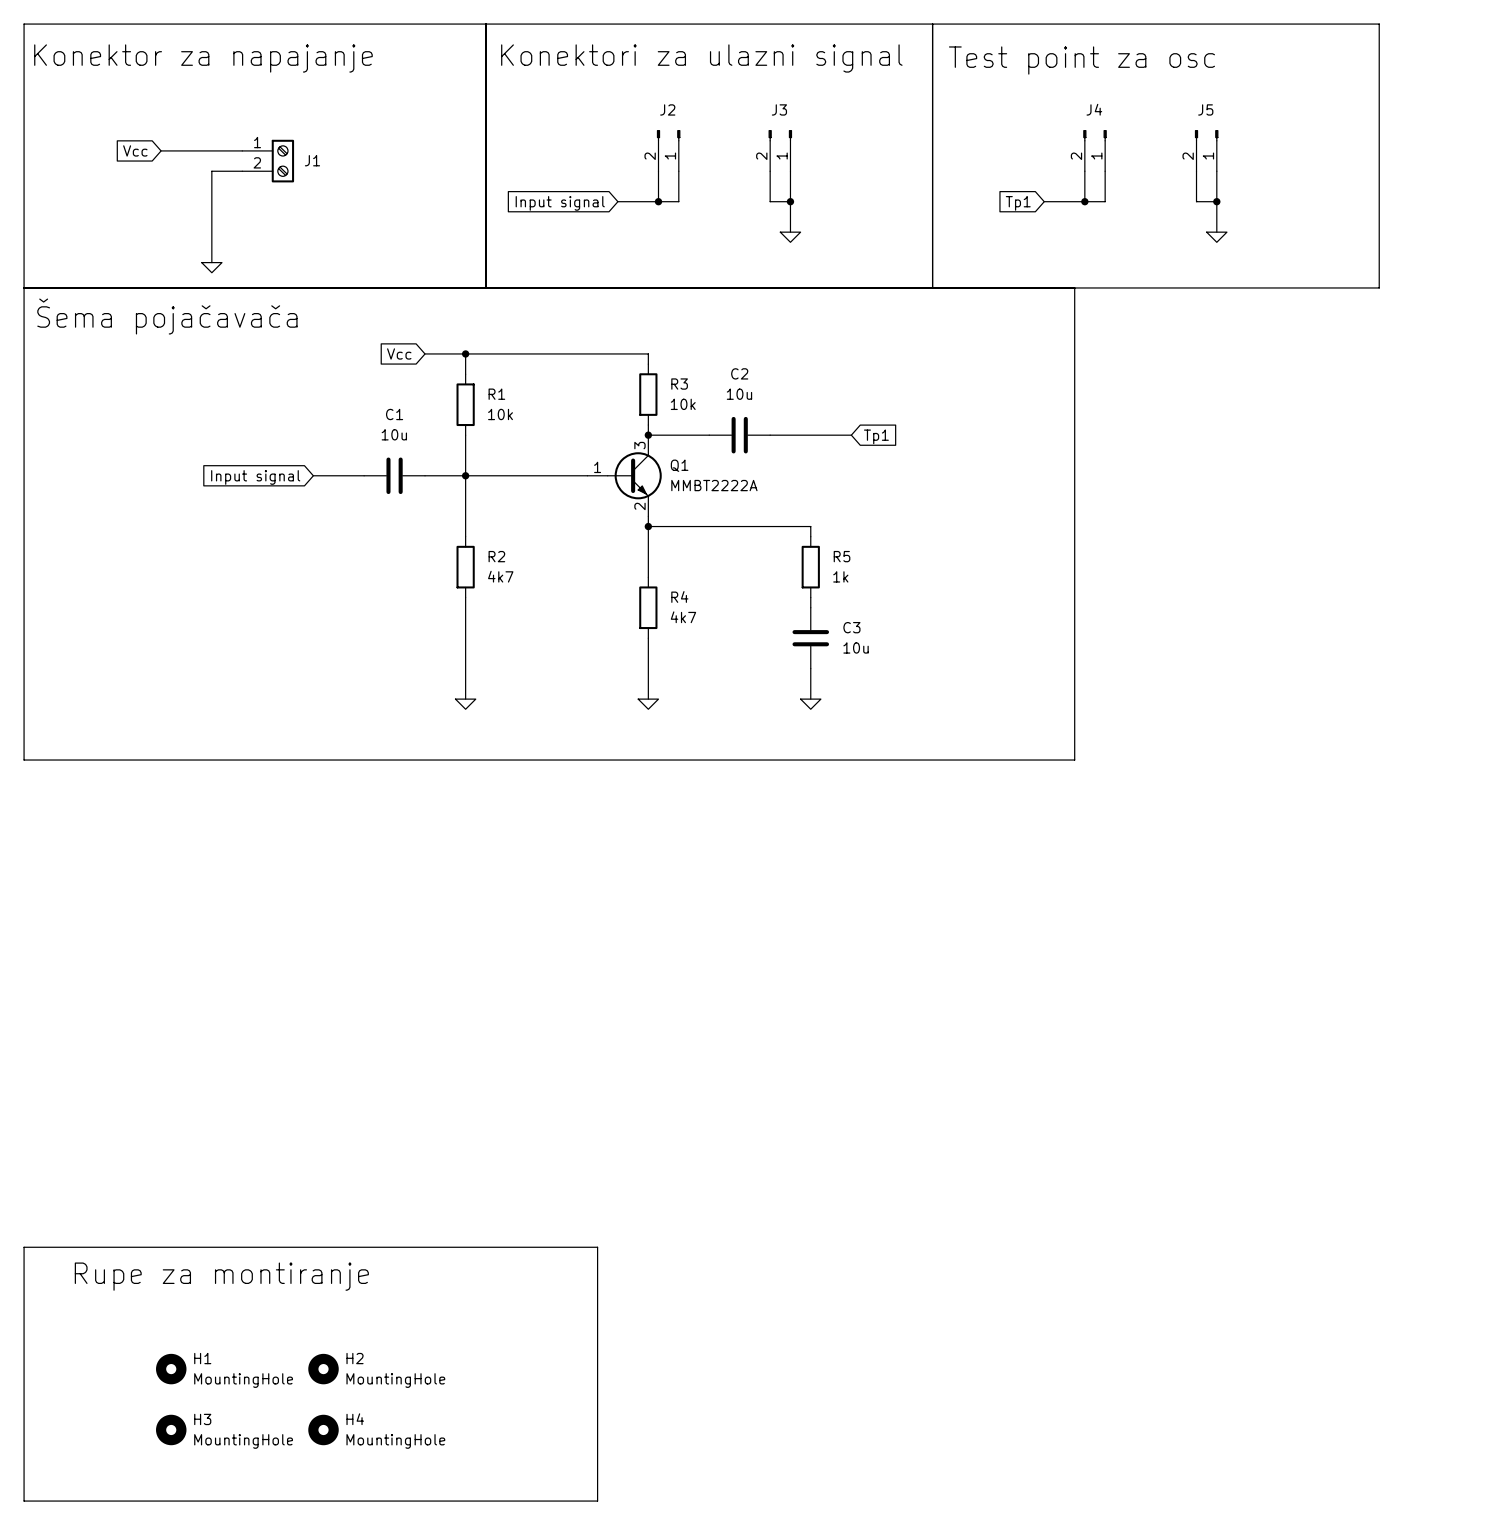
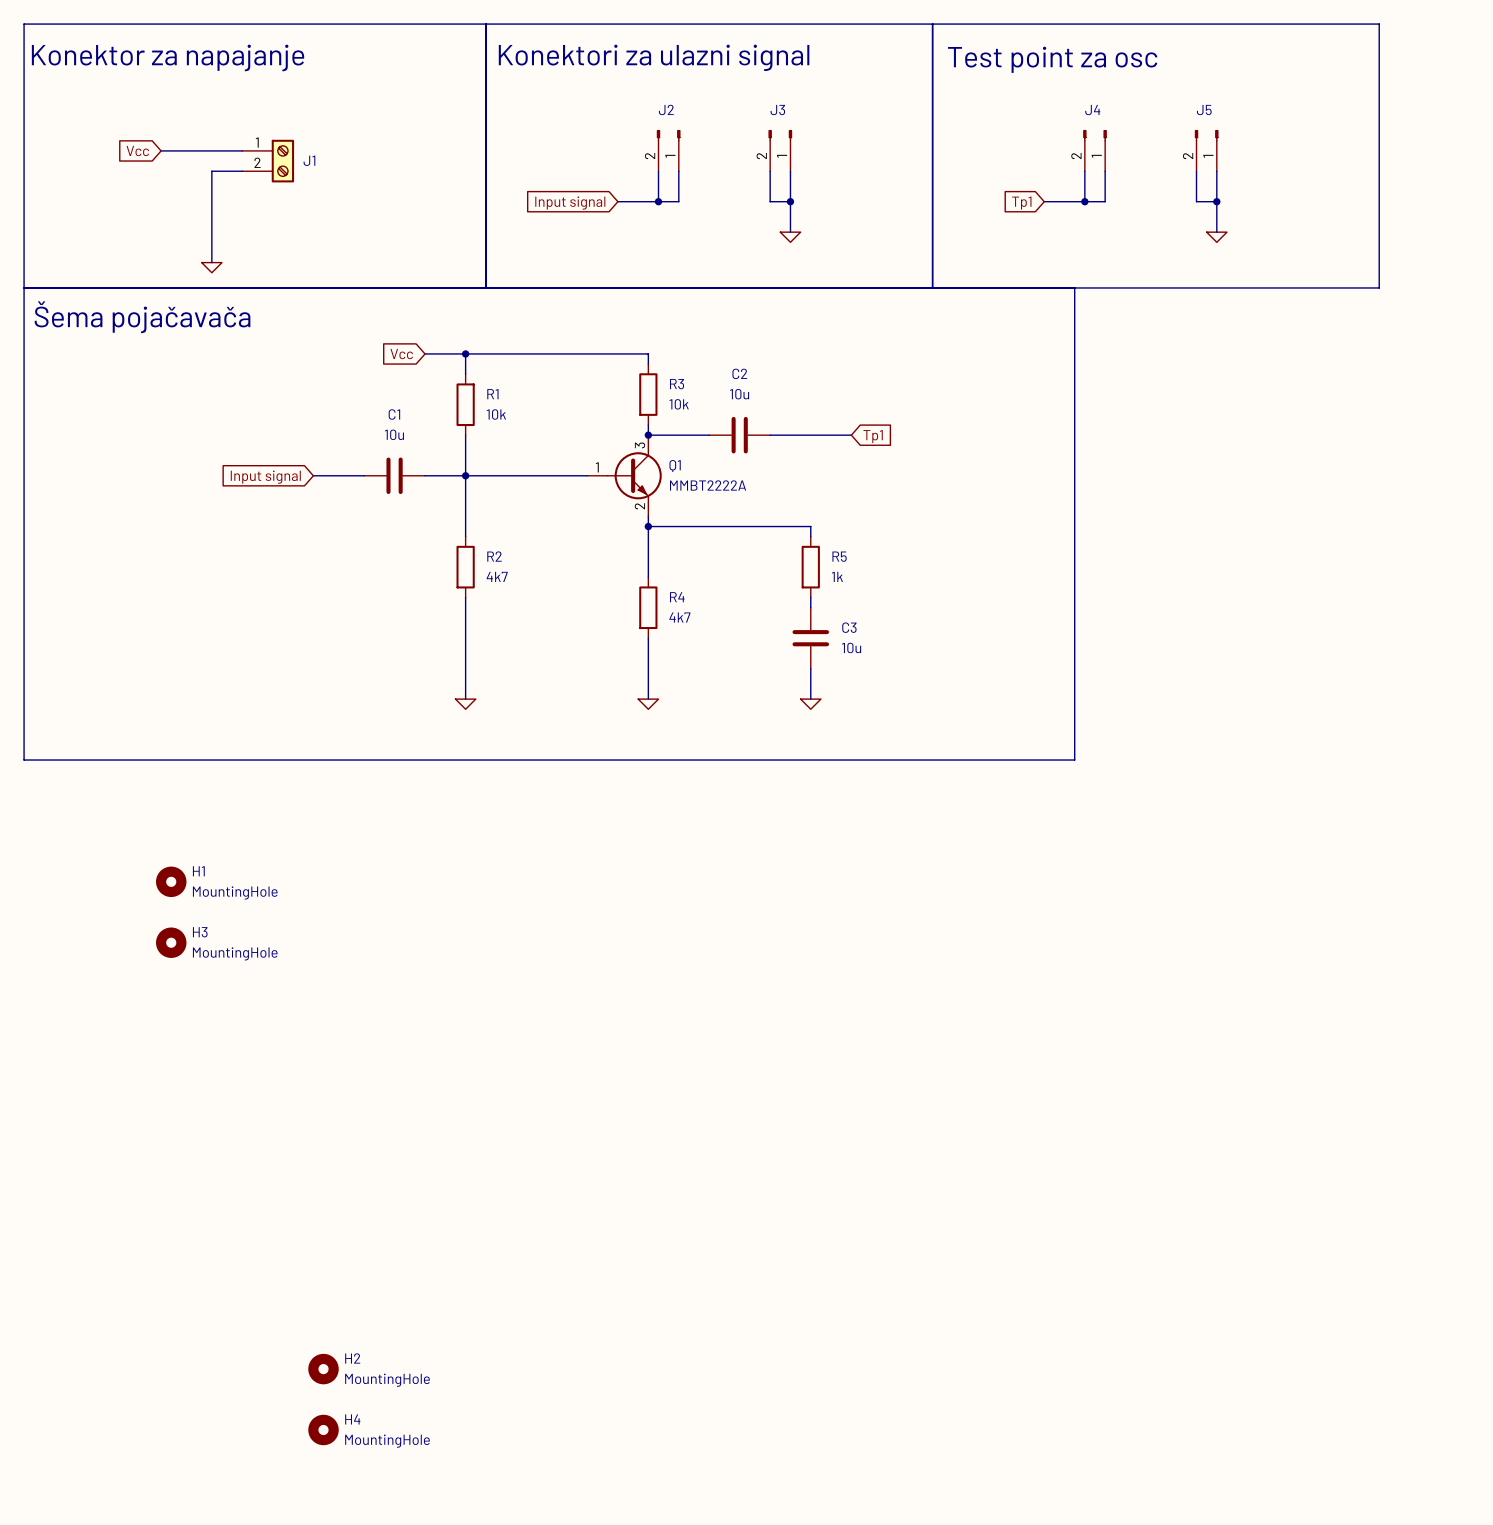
line: (24, 1247) (24, 1501) (597, 1501) (597, 1247) (24, 1247) -> none
text: Rupe za montiranje (221, 1276) -> none
H1 position: (171, 1369) -> (171, 881)
H3 position: (171, 1429) -> (171, 942)

